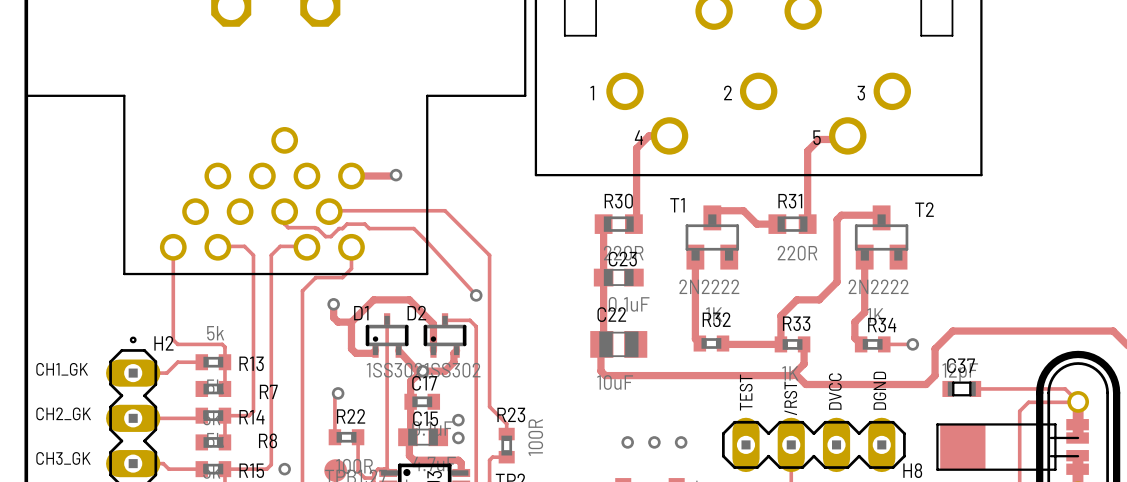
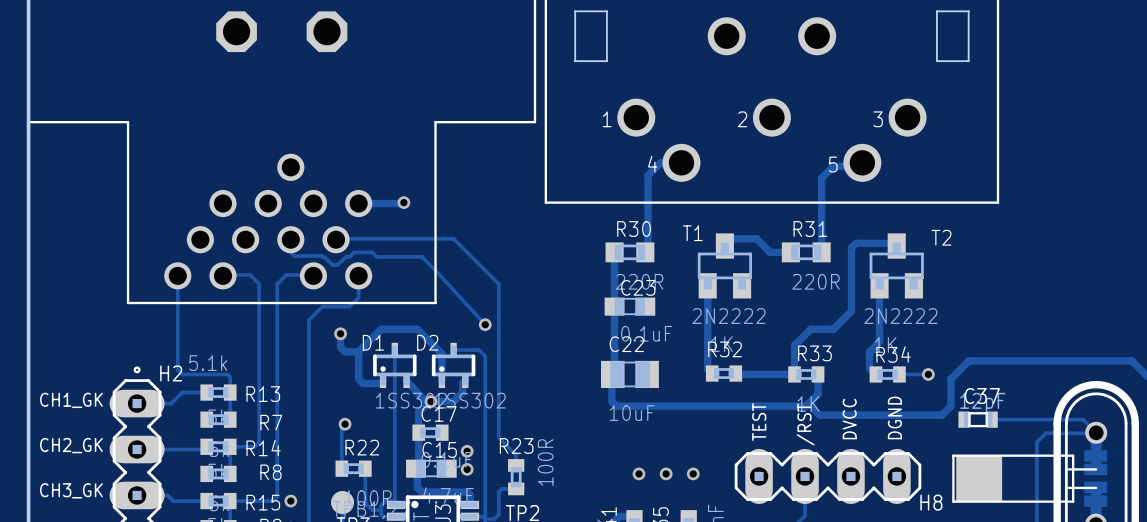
R7 value: 5k (215, 333) -> 5.1k (208, 363)

